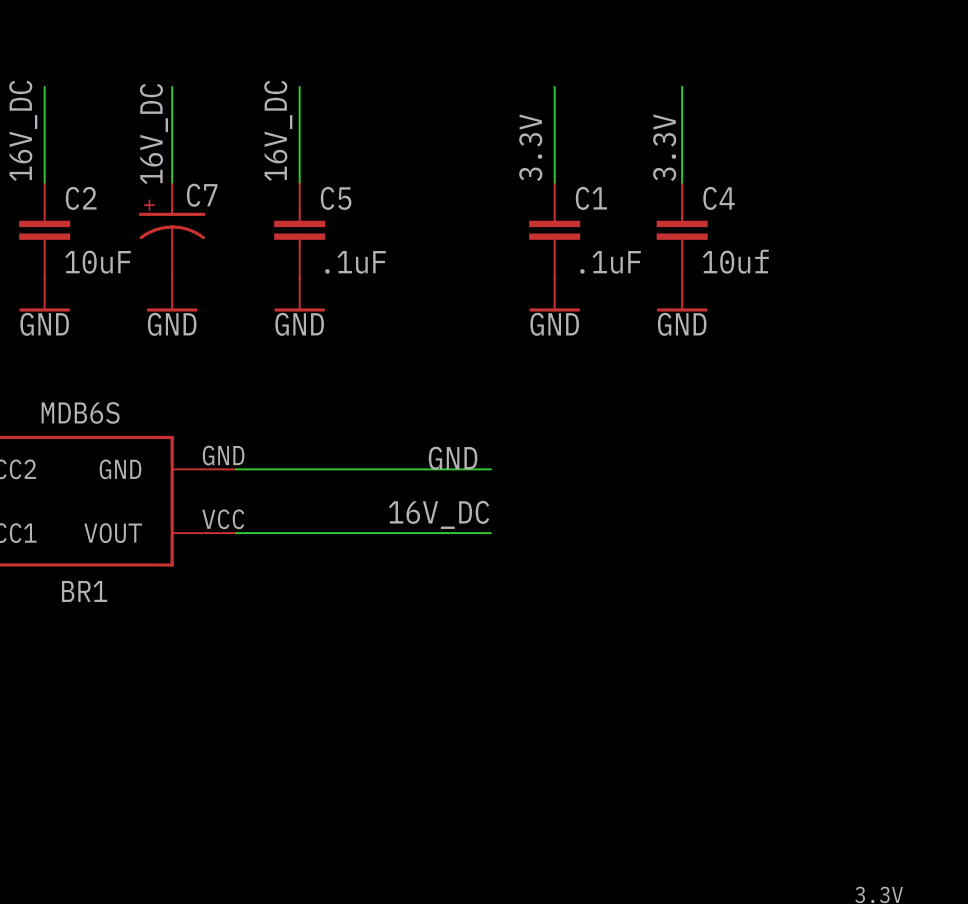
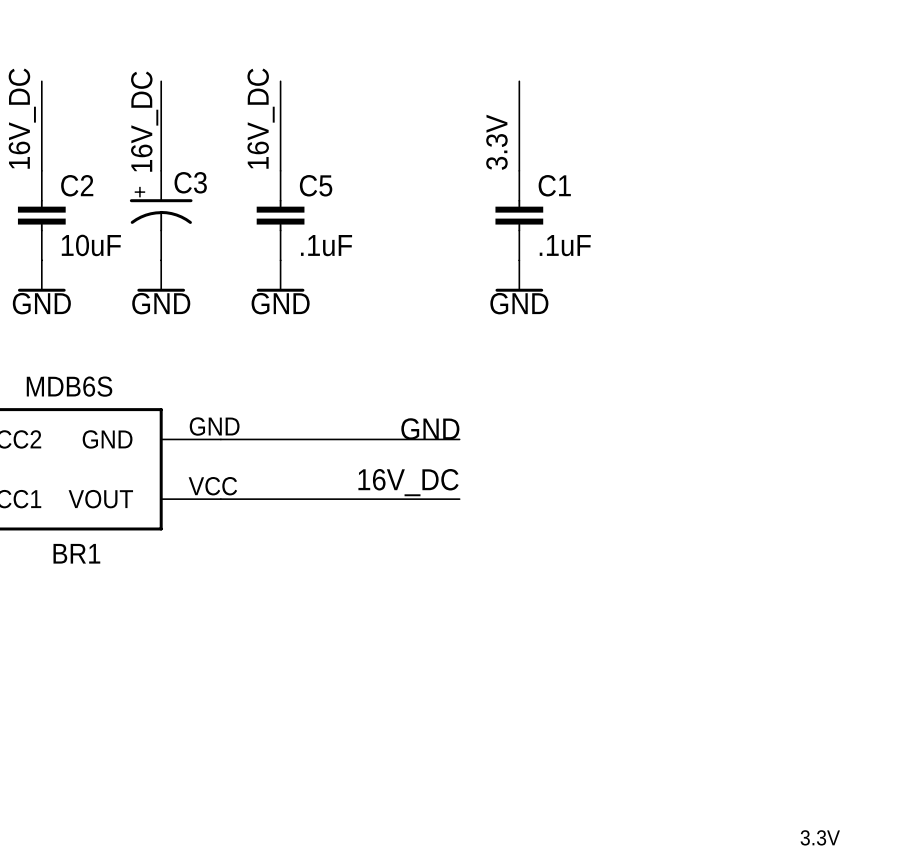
wire: (682, 86) (682, 182) -> none
label: 3.3V (664, 147) -> none
C7 name: C7 (202, 195) -> C3 (190, 182)
C4: 10uf (682, 230) -> none
power symbol: GND (682, 294) -> none

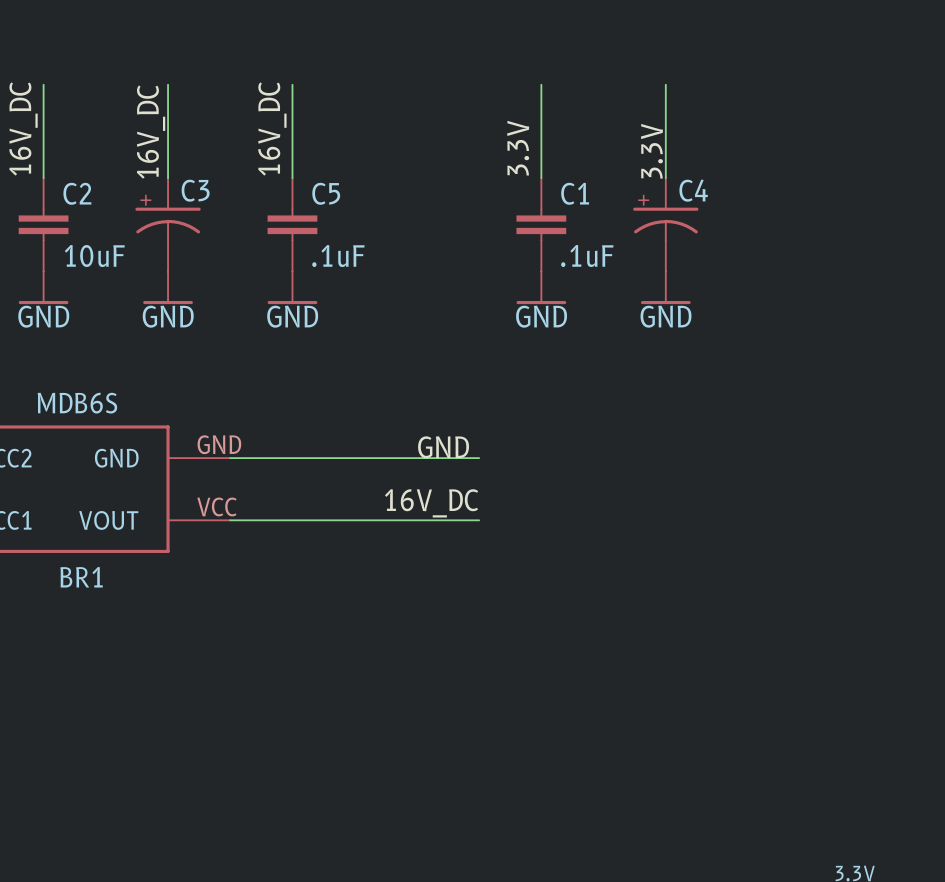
wire: none -> (665, 84) (665, 178)
label: none -> 3.3V (651, 151)
C4: none -> (665, 224)
power symbol: none -> GND (665, 287)

